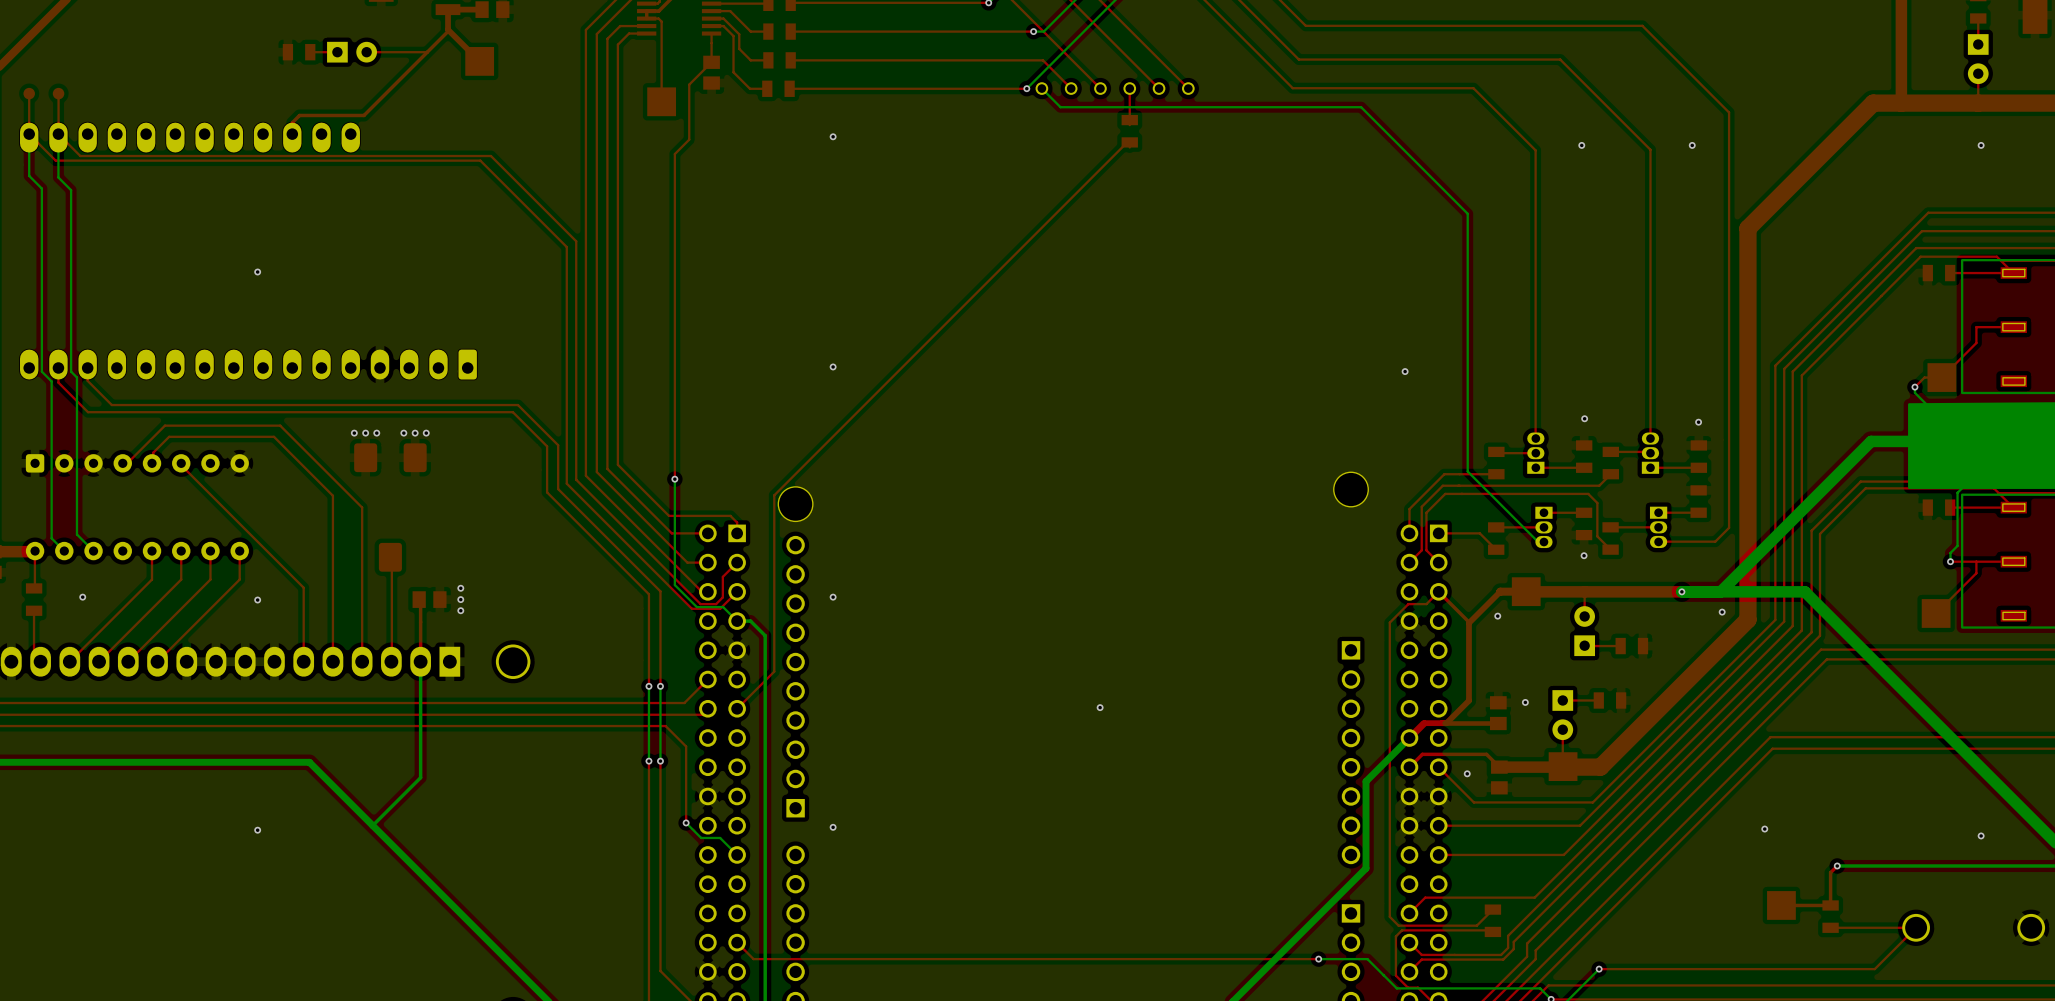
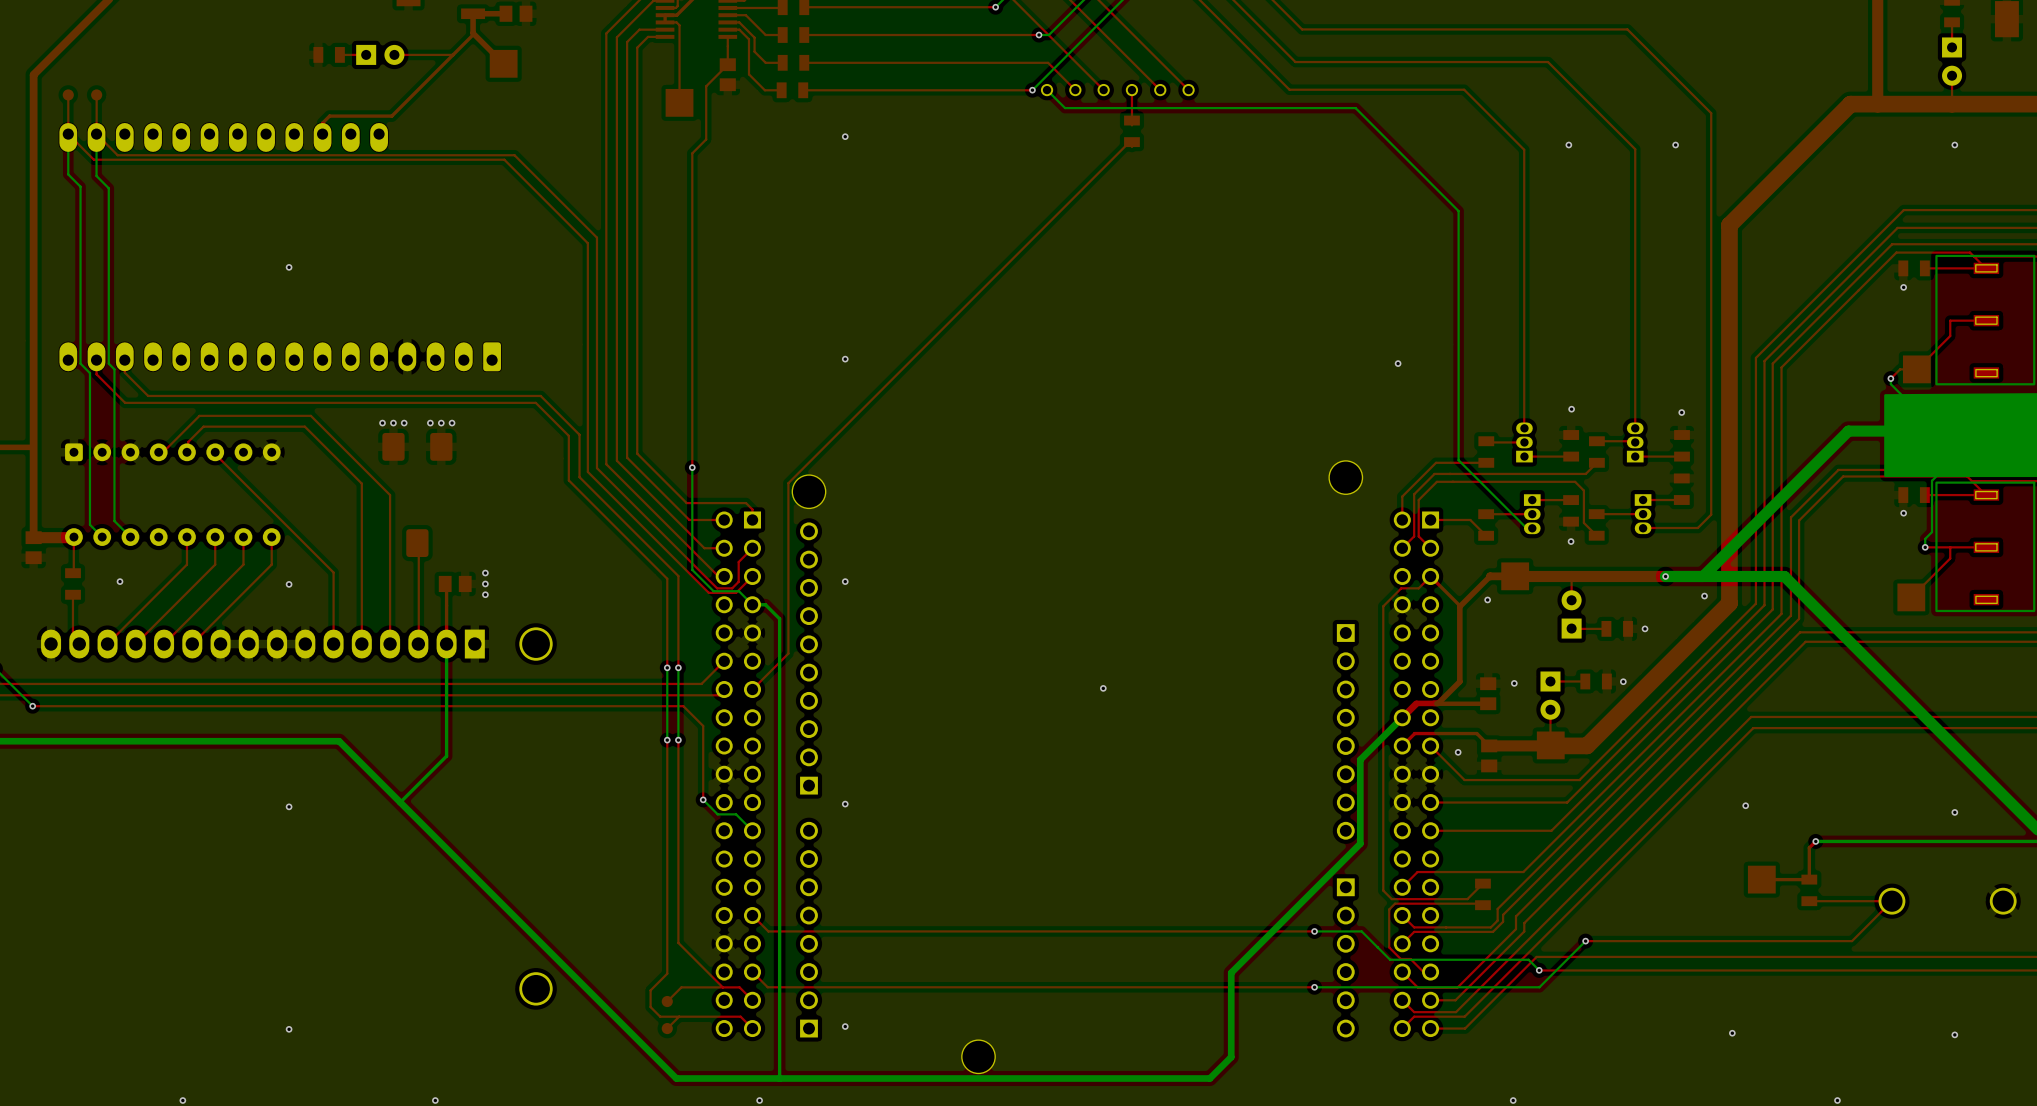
via: none -> (1903, 287)
via: none -> (1903, 513)
via: none -> (1645, 628)
via: none -> (1623, 681)

